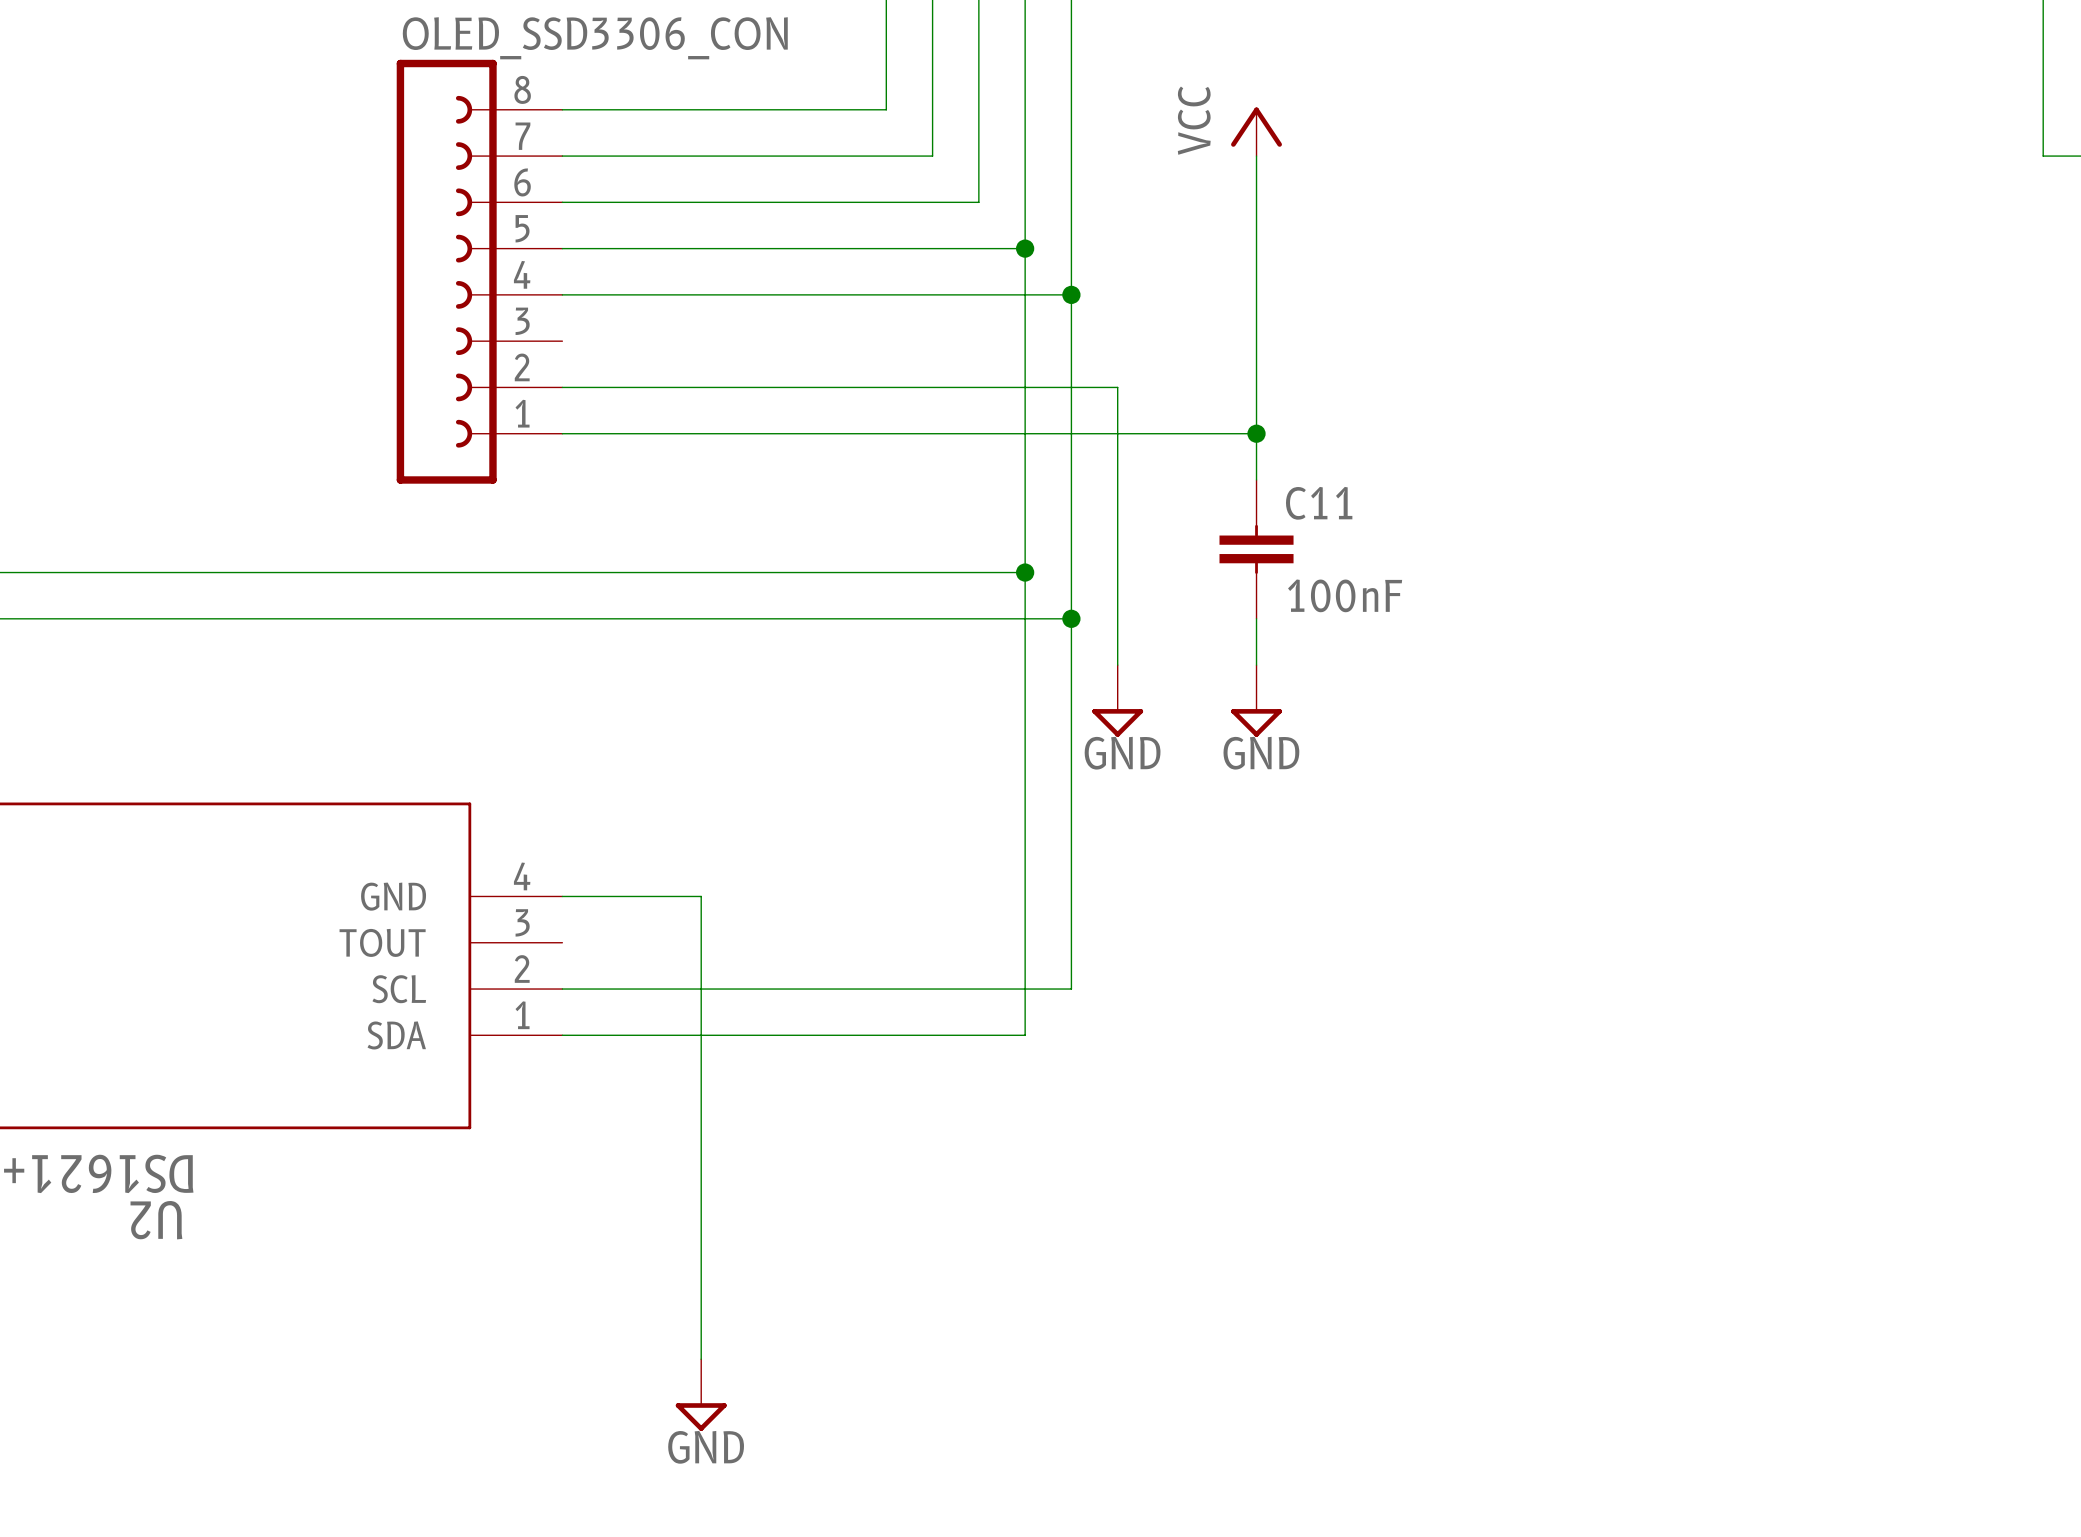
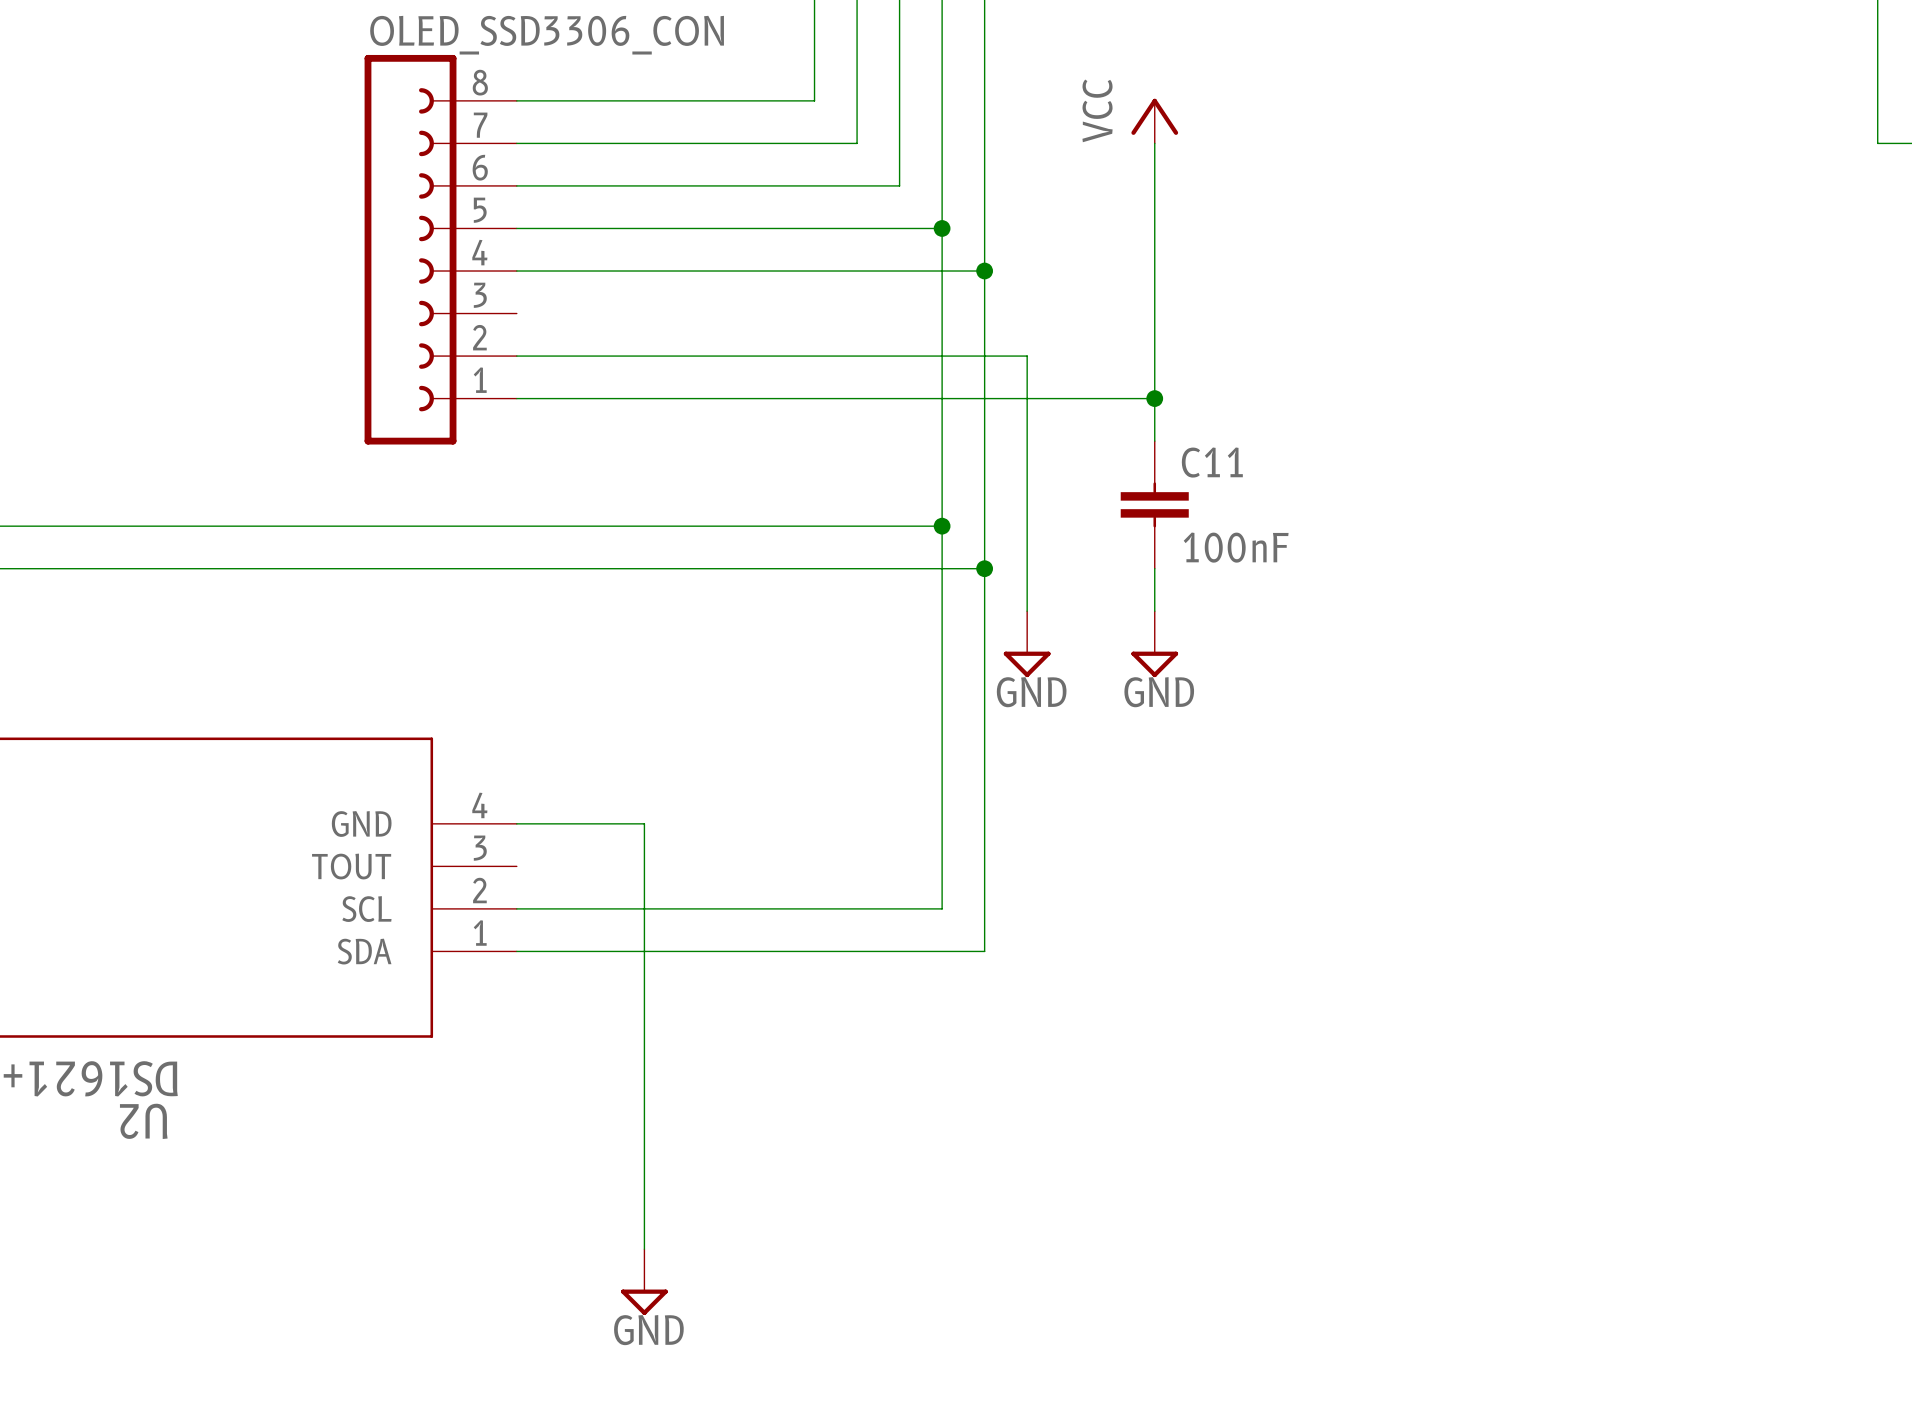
wire: (1071, 989) (1025, 989) (1025, 1035) -> (984, 908) (984, 951) (942, 951)

